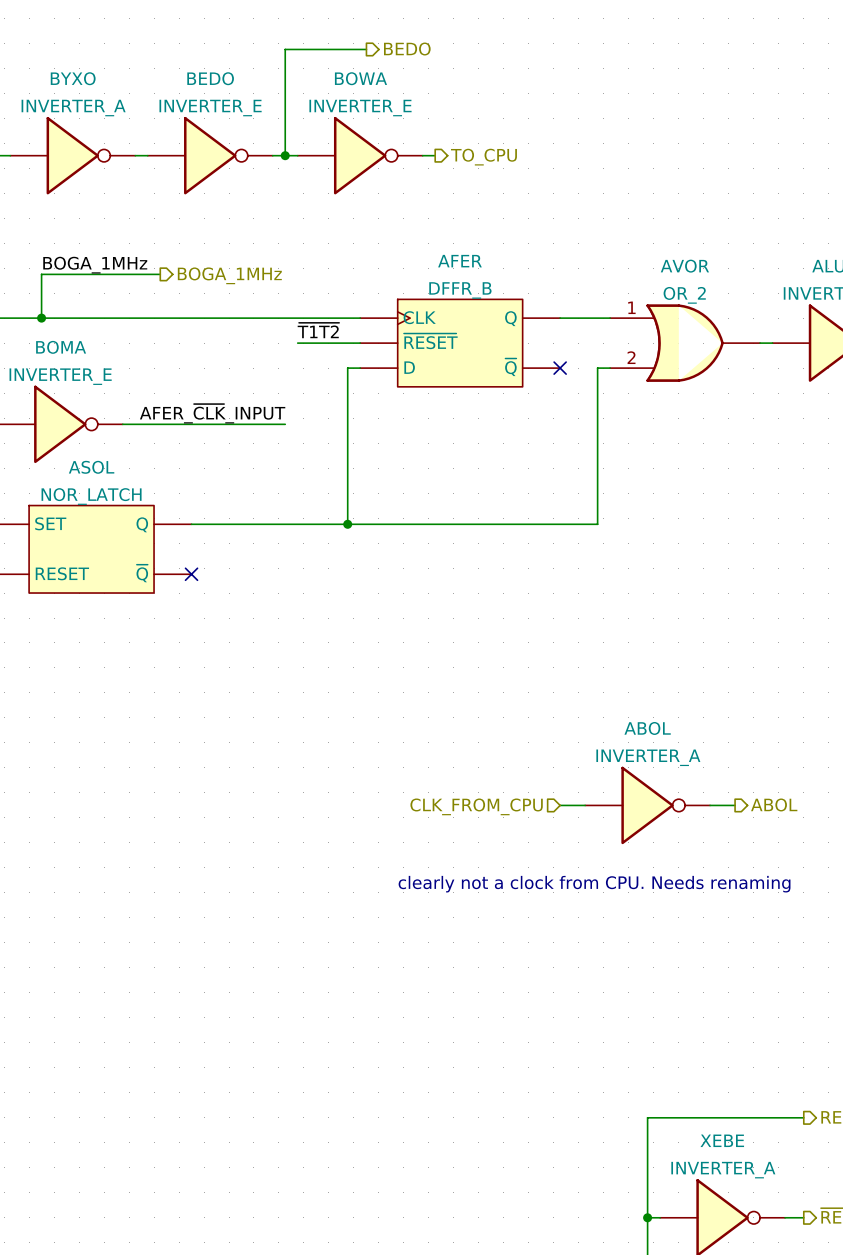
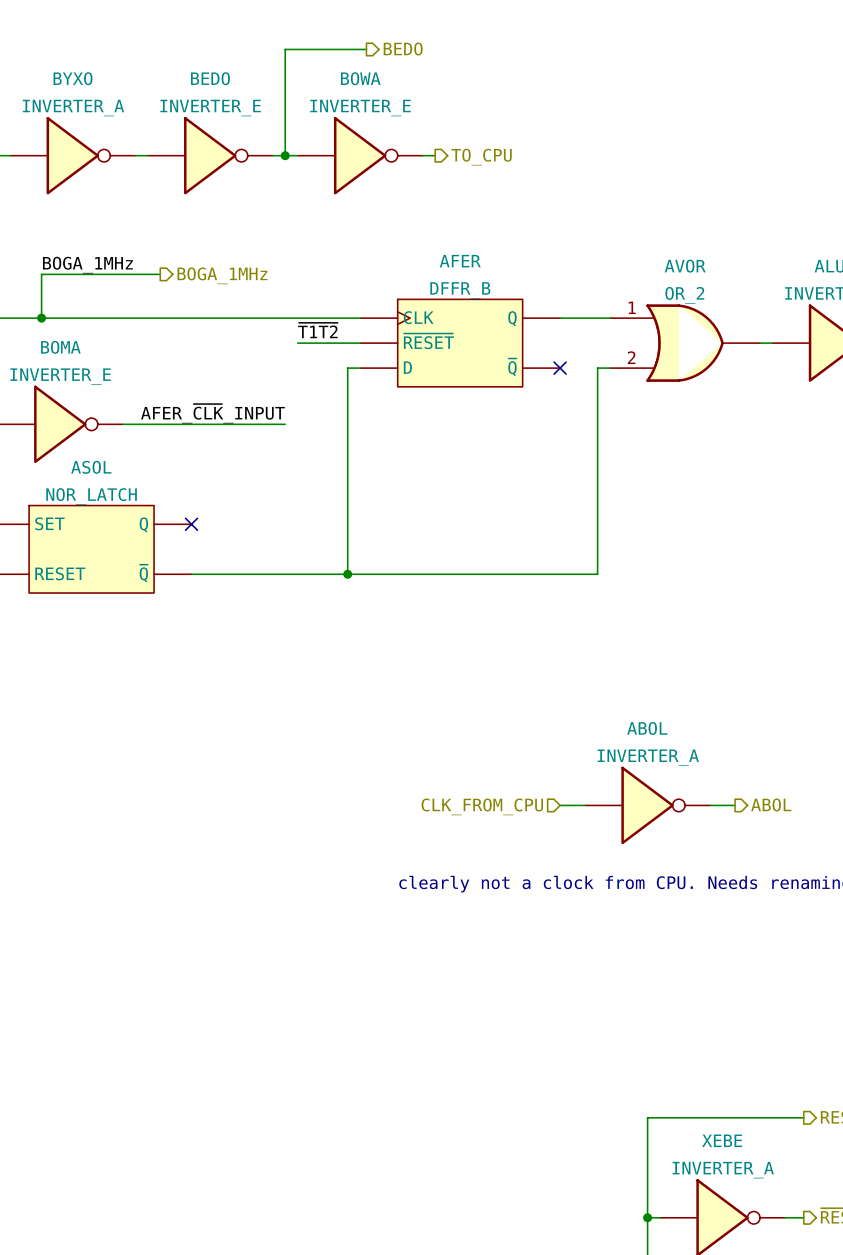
wire: (191, 524) (597, 524) -> (191, 574) (597, 574) (597, 524)
wire: none -> (347, 524) (347, 574)
junction position: (347, 524) -> (347, 574)
no-connect mark position: (191, 574) -> (191, 524)

